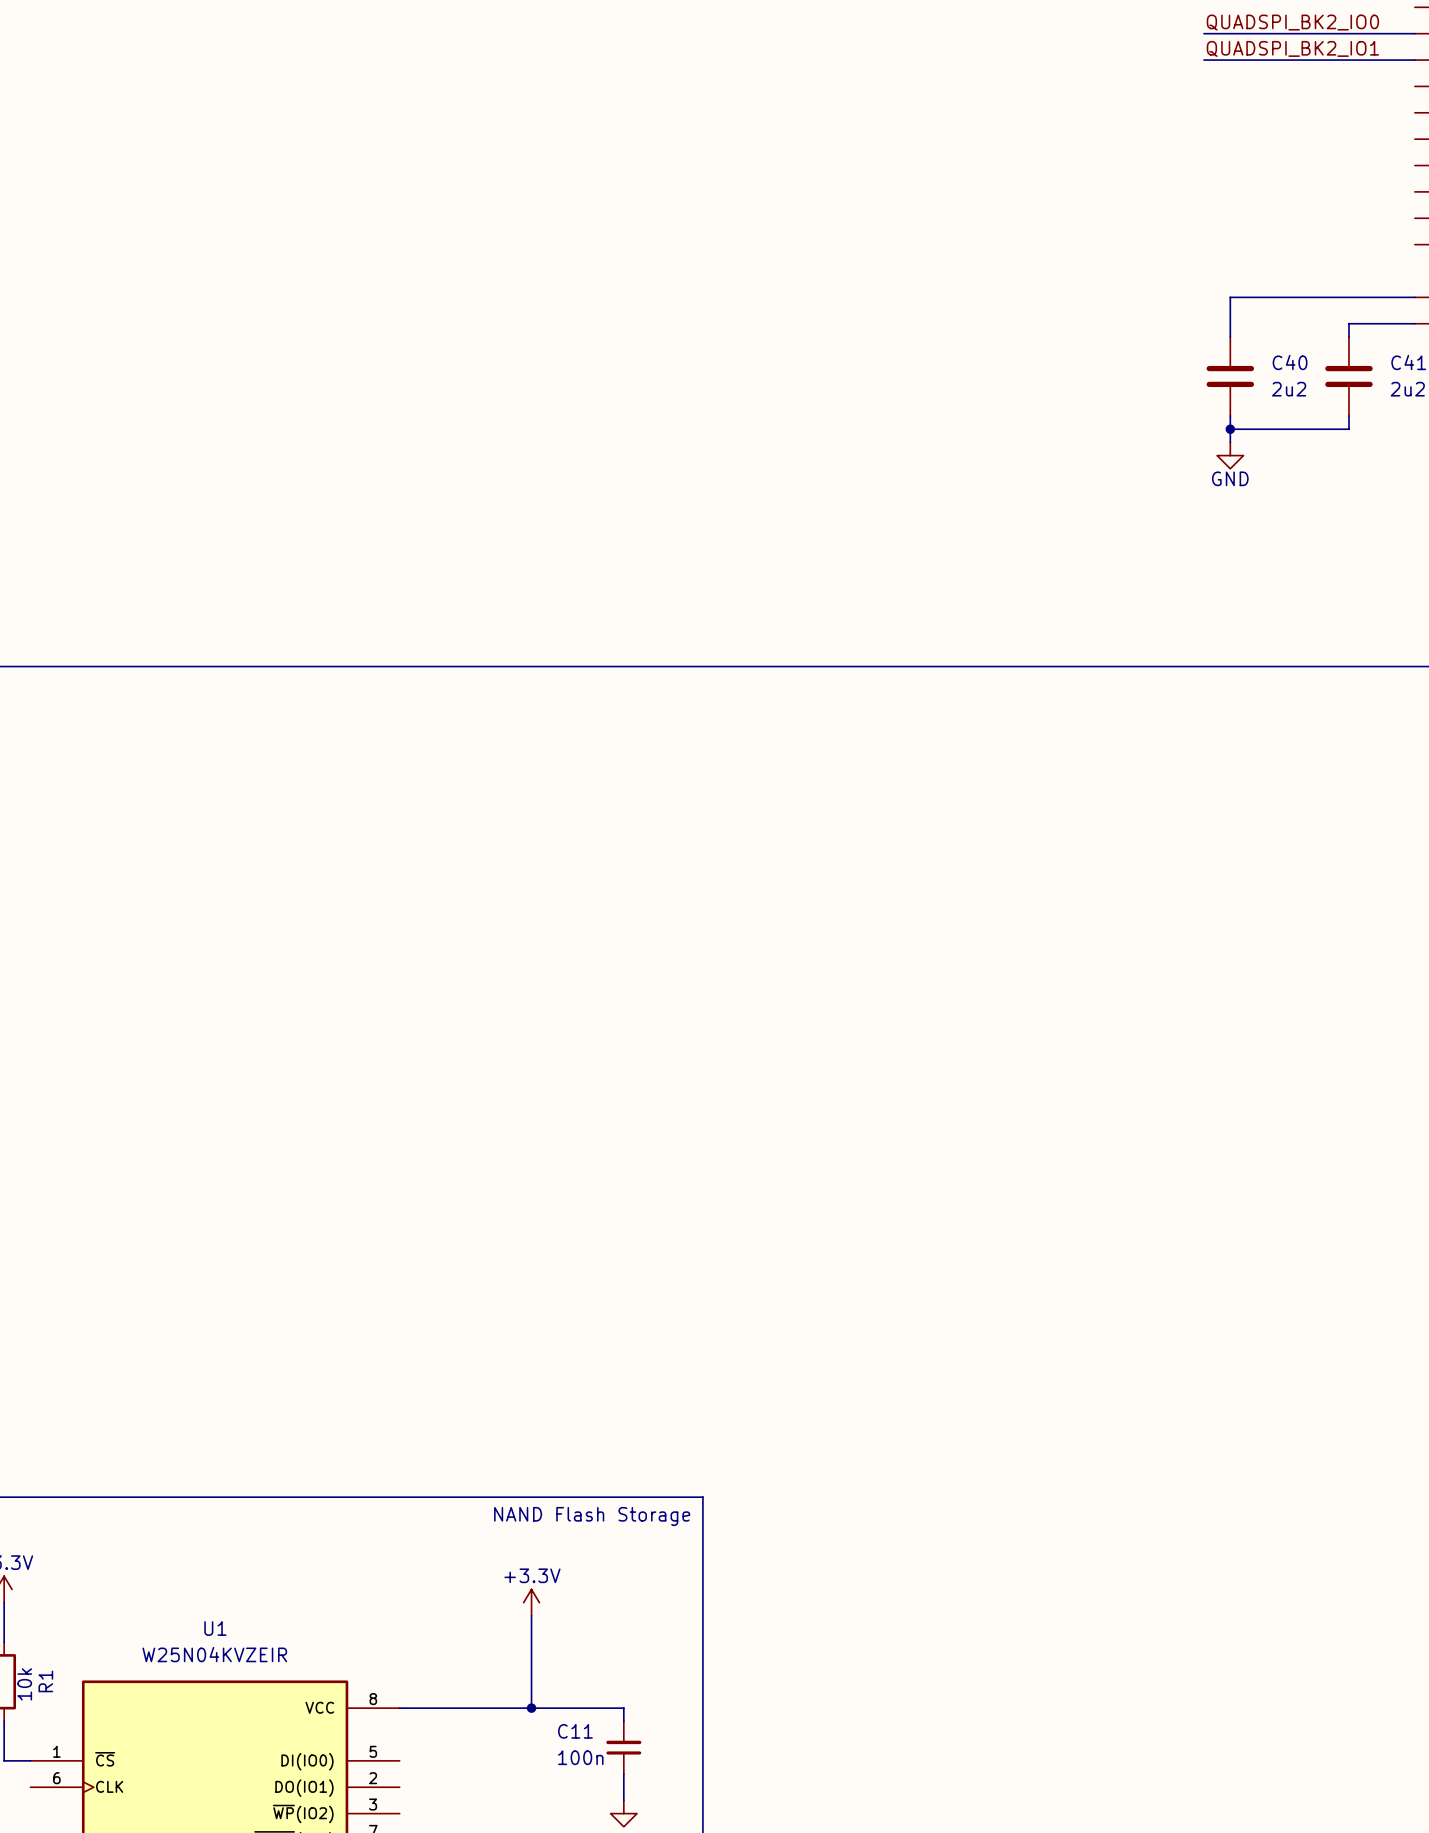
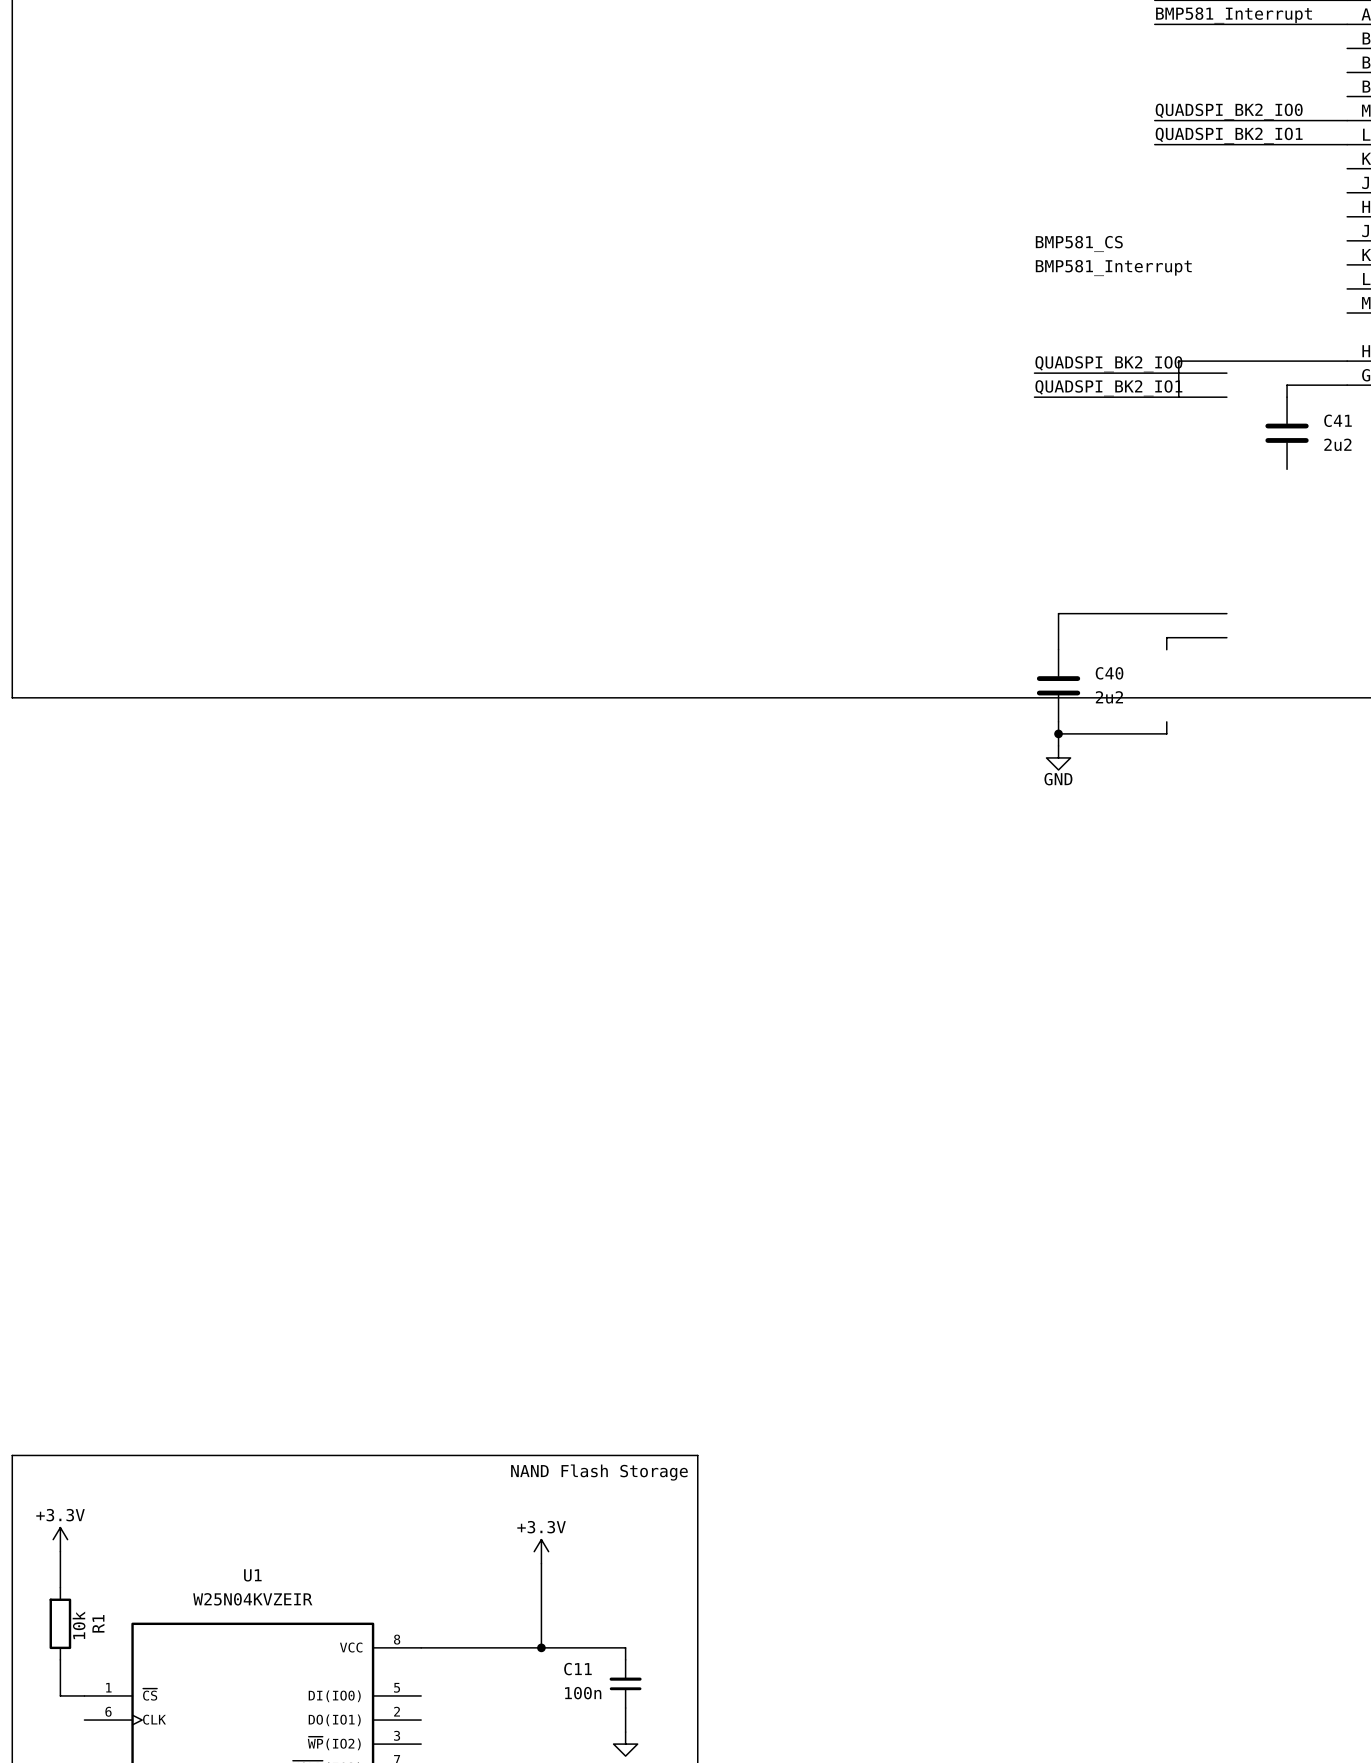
label: none -> BMP581_CS (1079, 243)
label: none -> BMP581_Interrupt (1113, 268)
label: none -> QUADSPI_BK2_IO0 (1108, 364)
wire: none -> (1034, 373) (1226, 373)
label: none -> QUADSPI_BK2_IO1 (1108, 388)
wire: none -> (1034, 397) (1226, 397)
C40 position: (1230, 376) -> (1058, 685)
wire: (1230, 416) (1230, 442) -> none
wire: (1348, 416) (1348, 429) (1230, 429) -> none
junction: (1230, 429) -> none
power symbol: GND (1230, 455) -> none
wire: none -> (1226, 613) (1058, 613) (1058, 649)
wire: none -> (1226, 637) (1166, 637) (1166, 649)
wire: none -> (1058, 721) (1058, 745)
wire: none -> (1166, 721) (1166, 733) (1058, 733)
junction: none -> (1058, 733)
power symbol: none -> GND (1058, 757)

